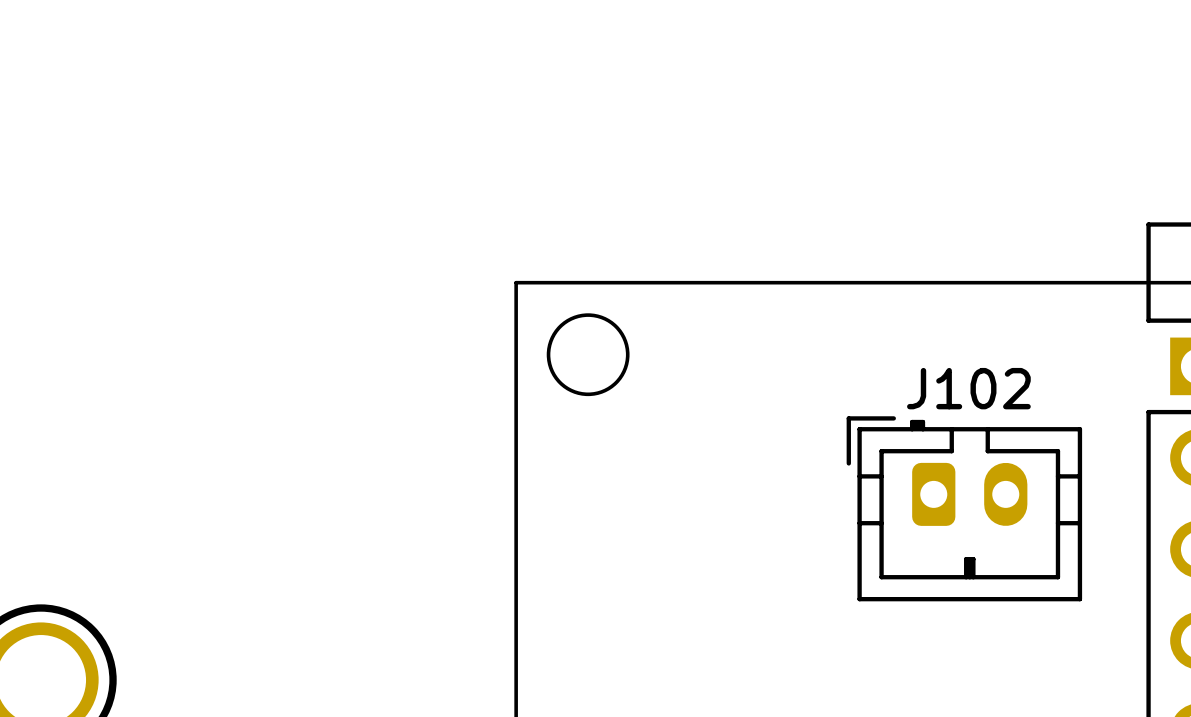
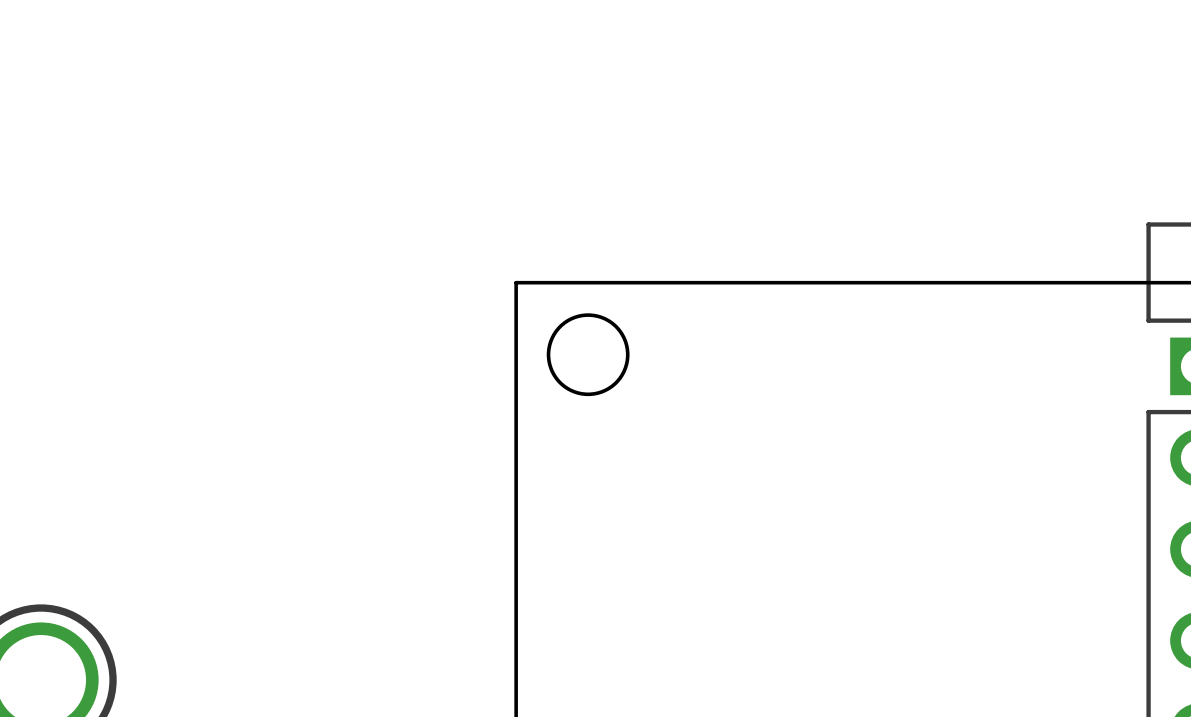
J102: (964, 508) -> none

